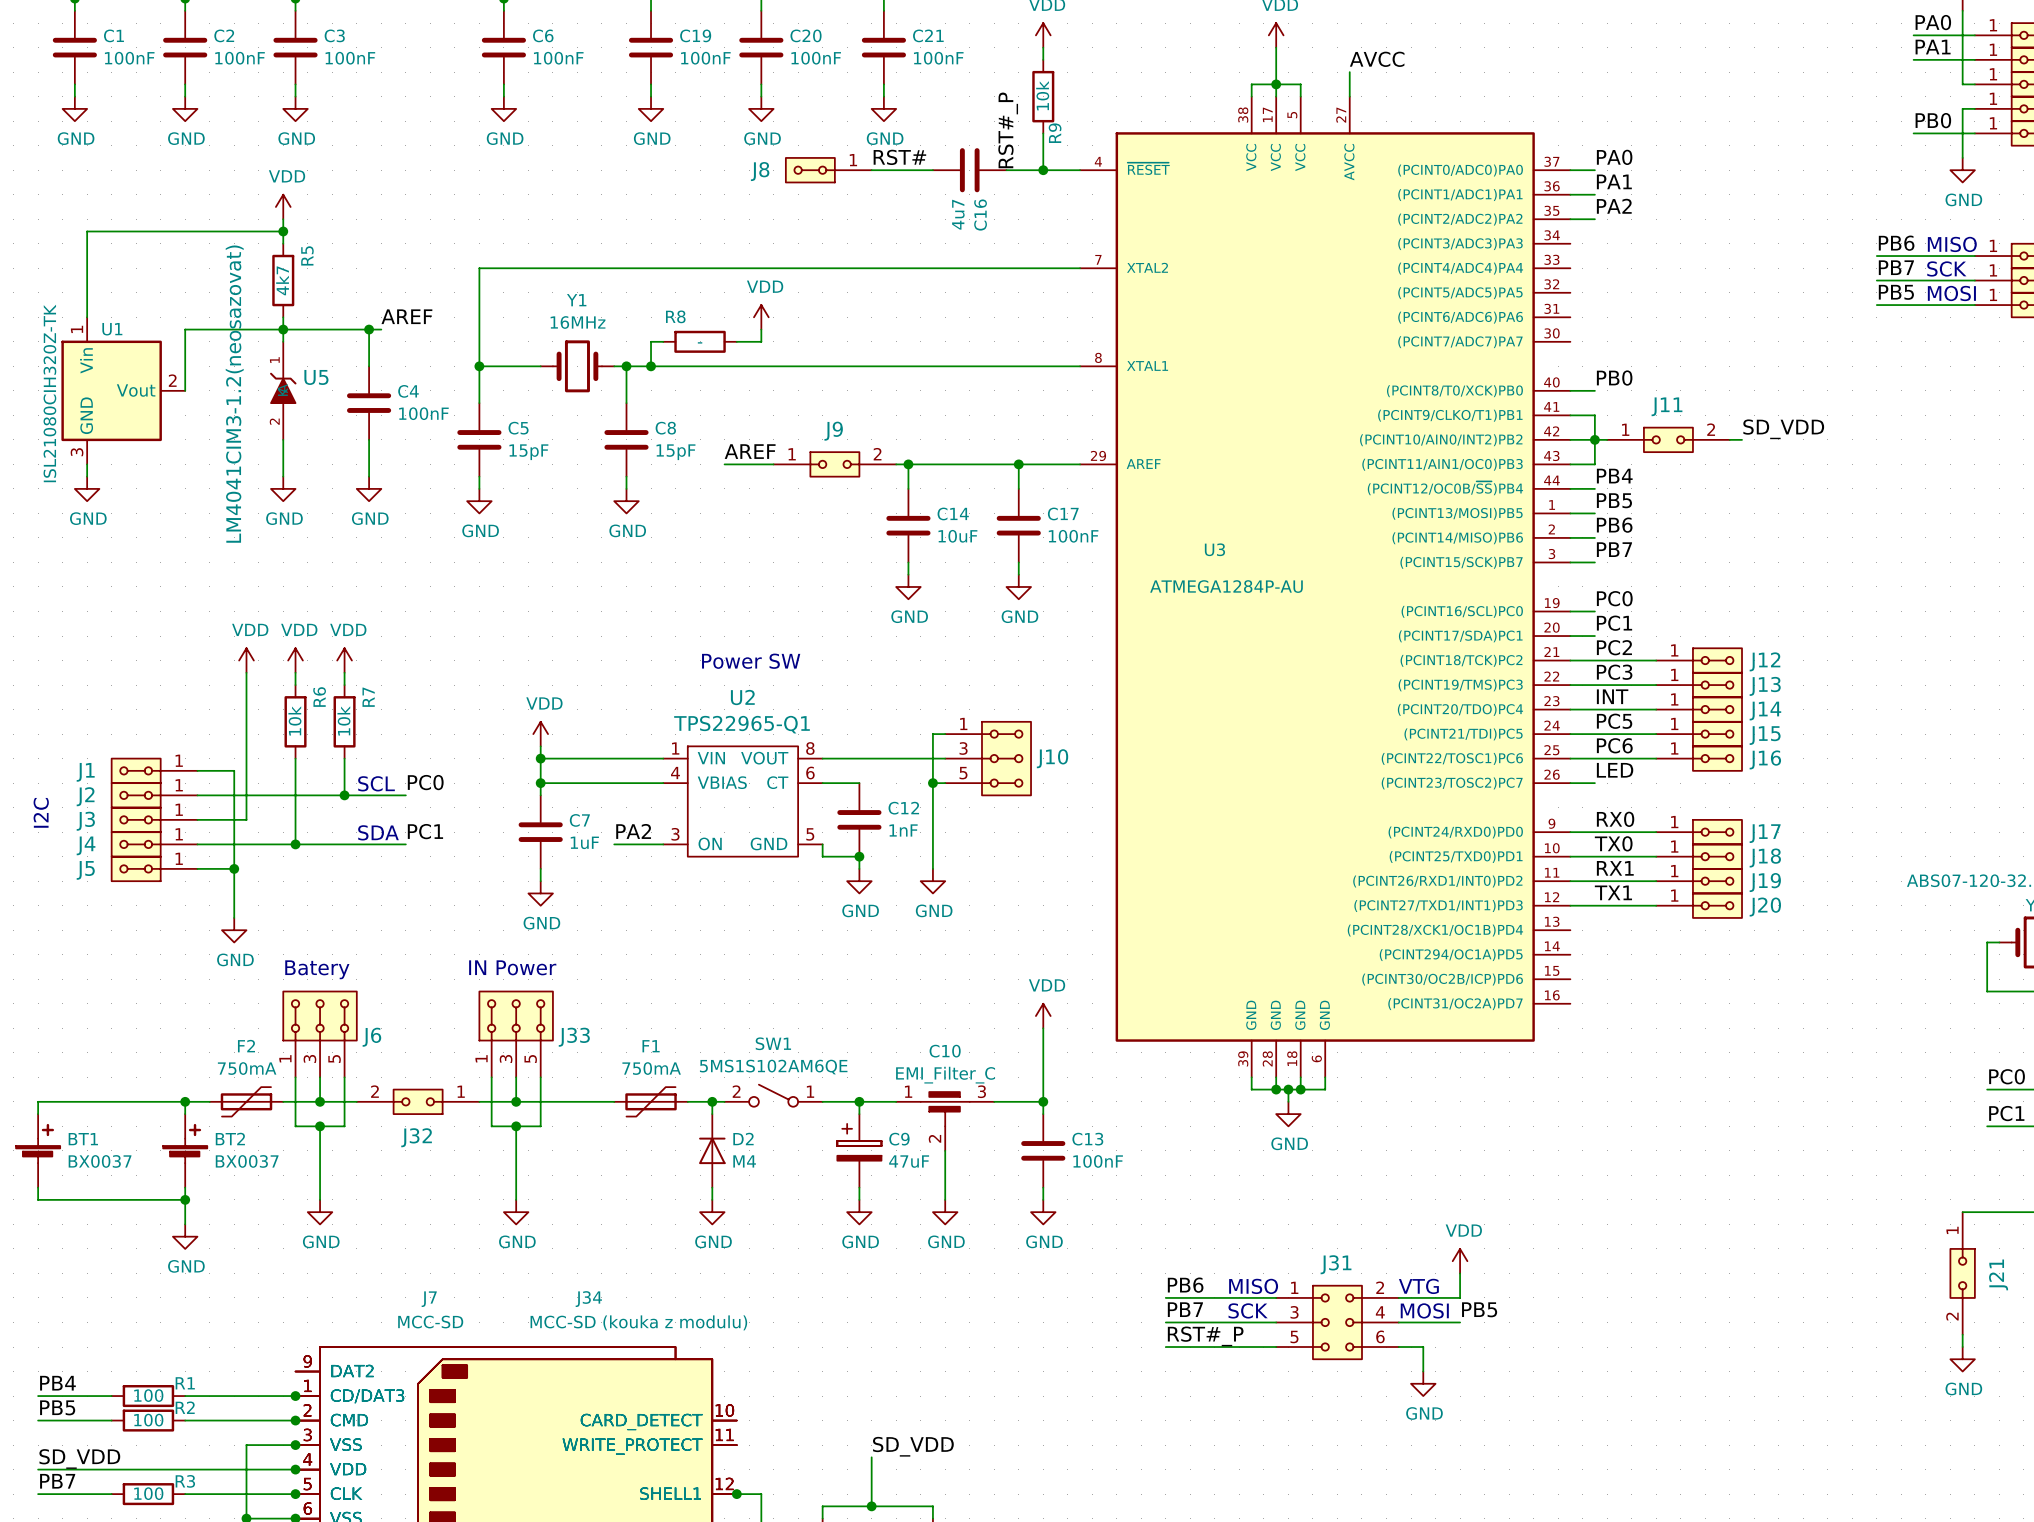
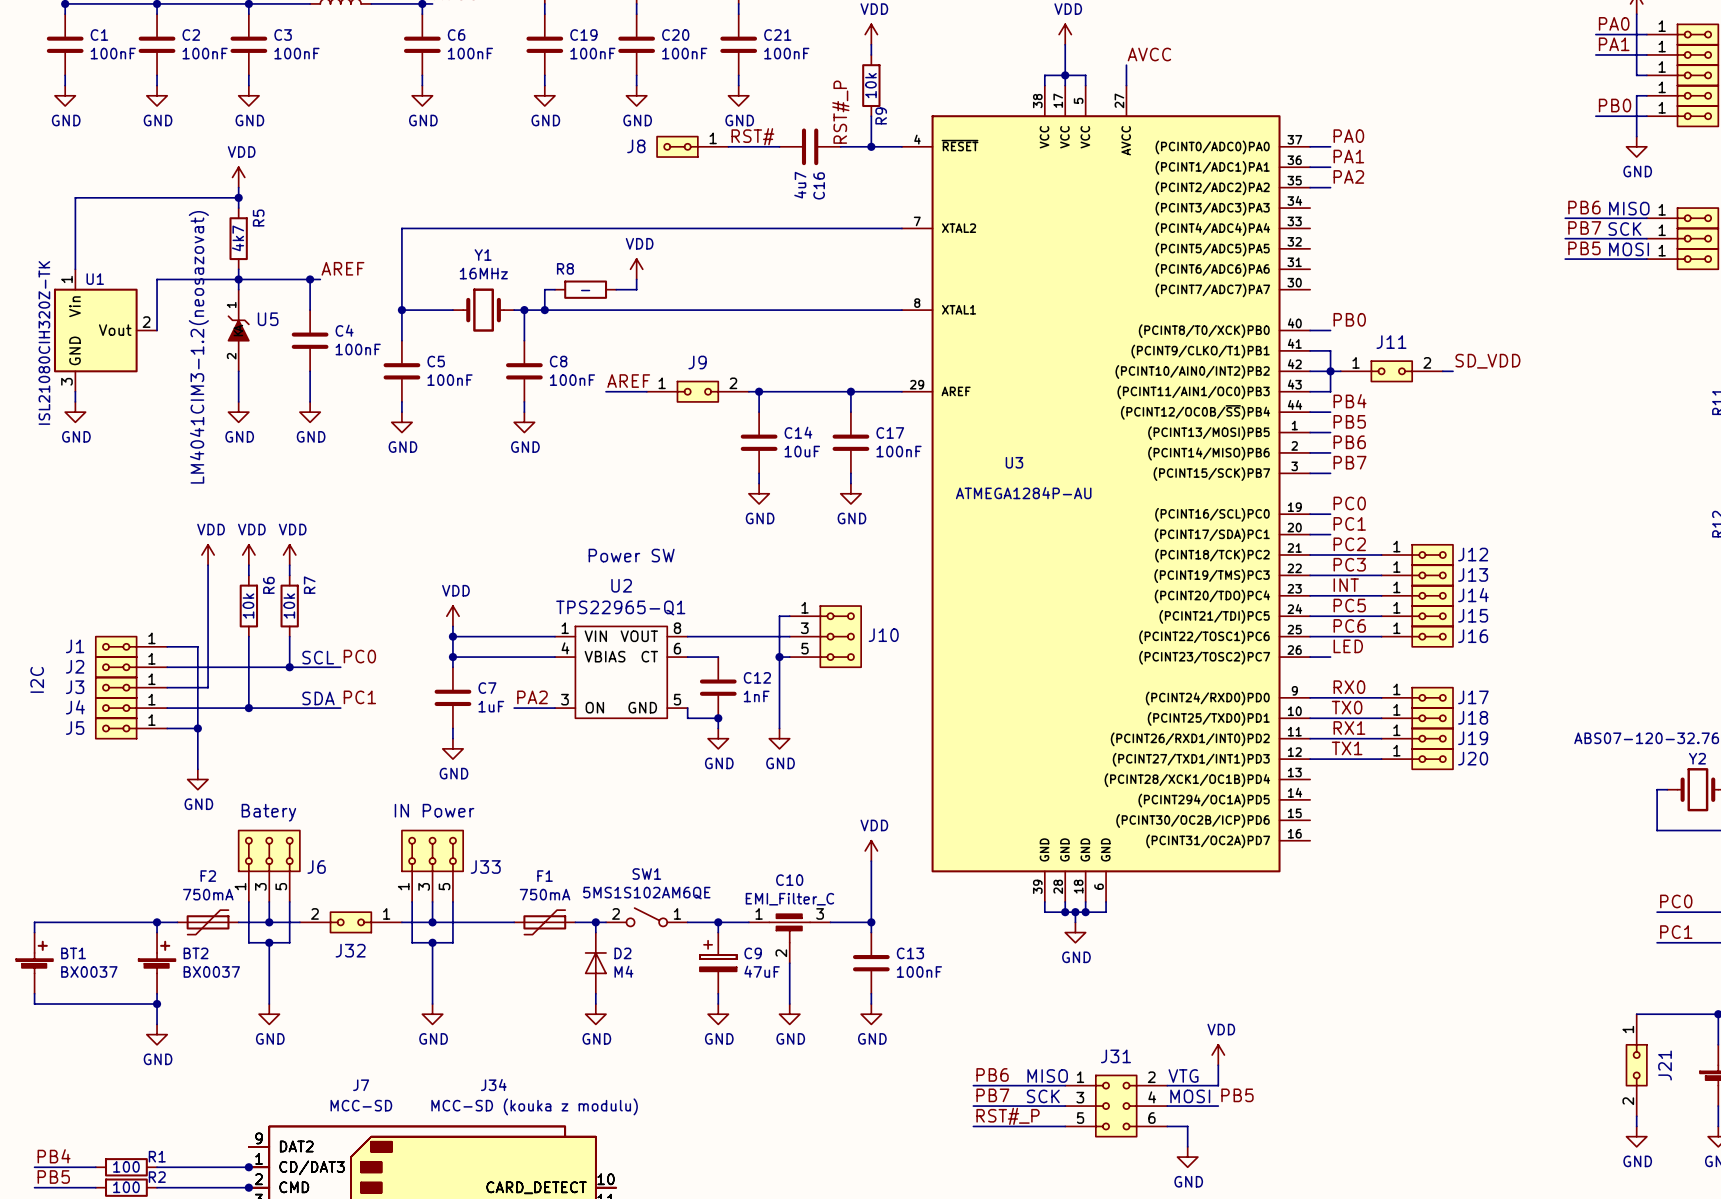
C5 value: 15pF (528, 452) -> 100nF (450, 380)
C8 value: 15pF (676, 452) -> 100nF (572, 380)

